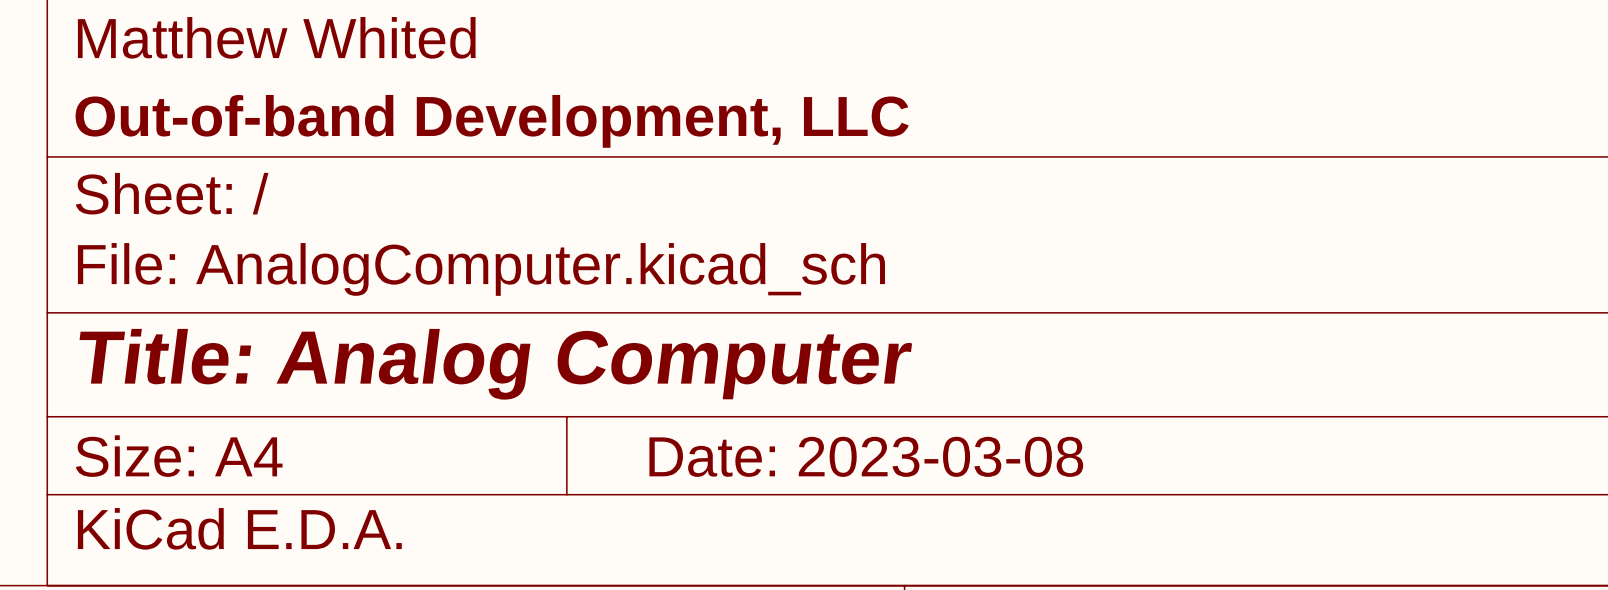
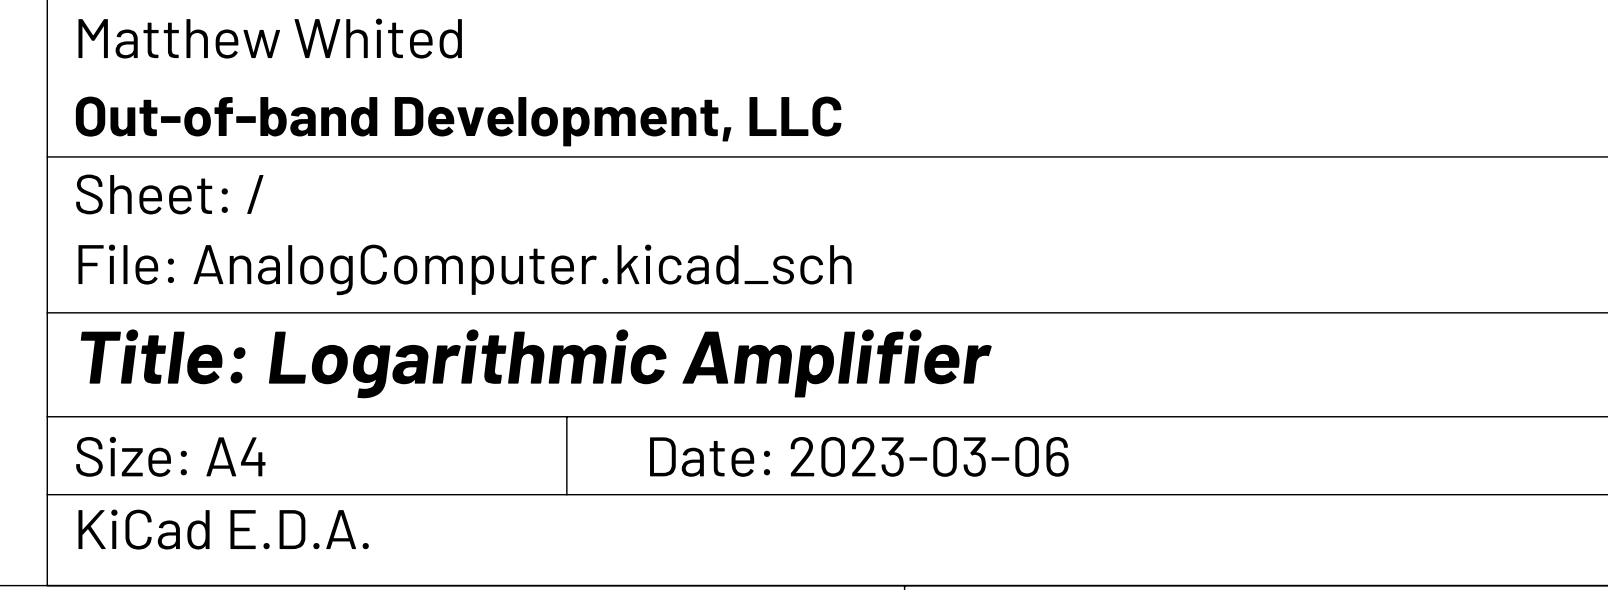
title block: Title: Analog Computer (495, 364) -> Title: Logarithmic Amplifier (536, 363)
title block: Date: 2023-03-08 (866, 456) -> Date: 2023-03-06 (859, 456)

